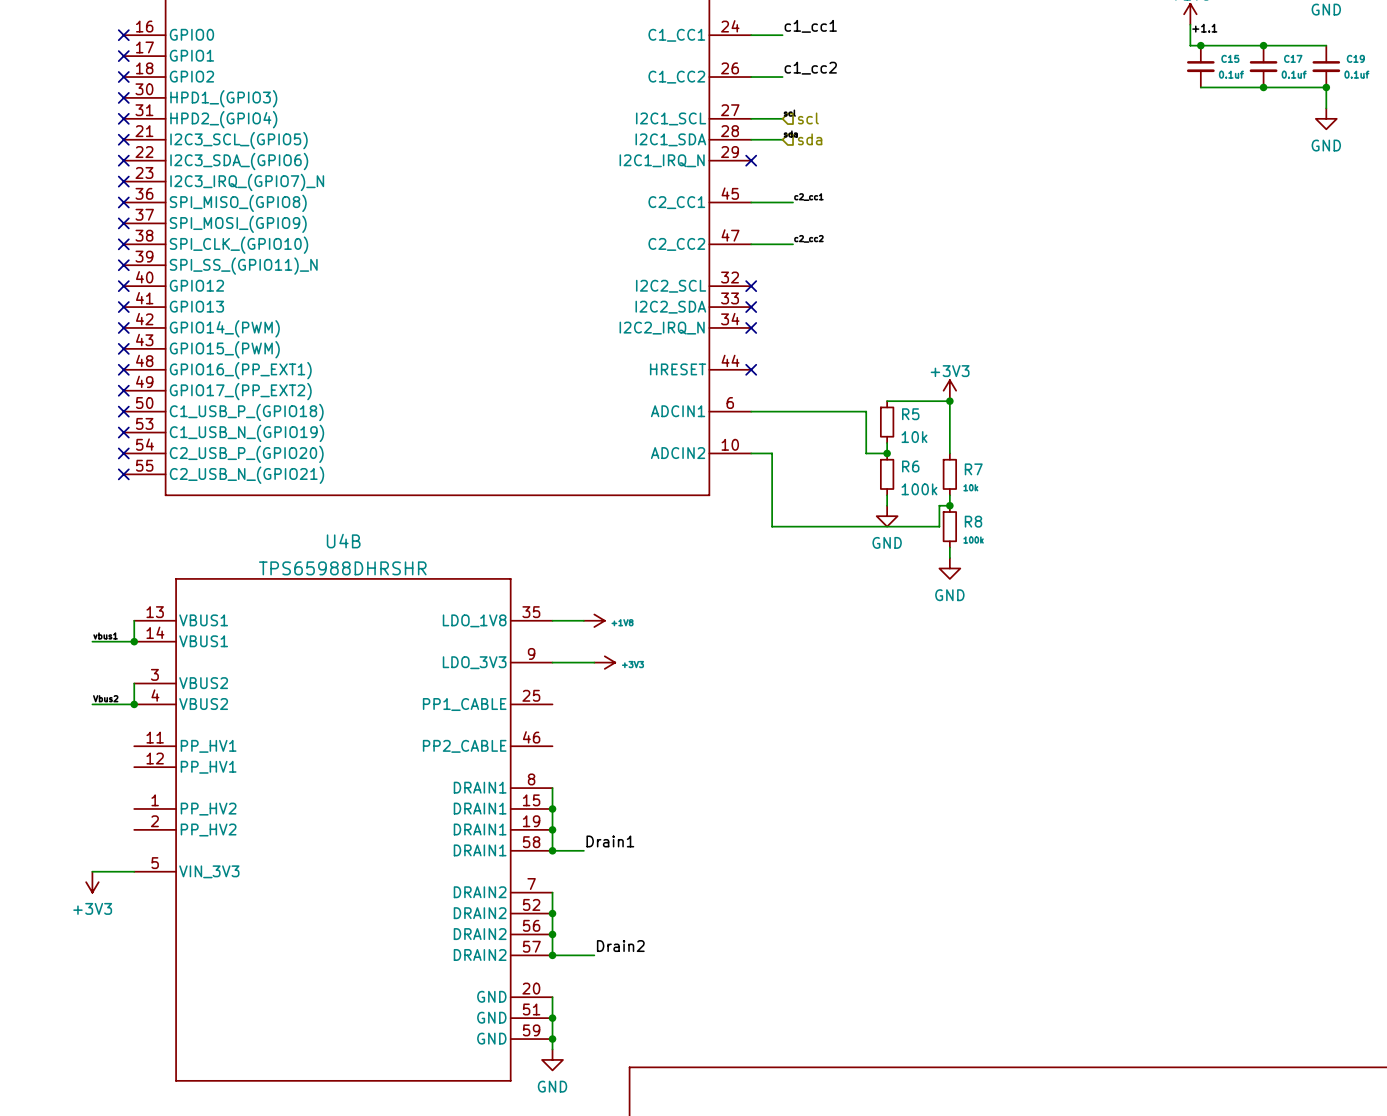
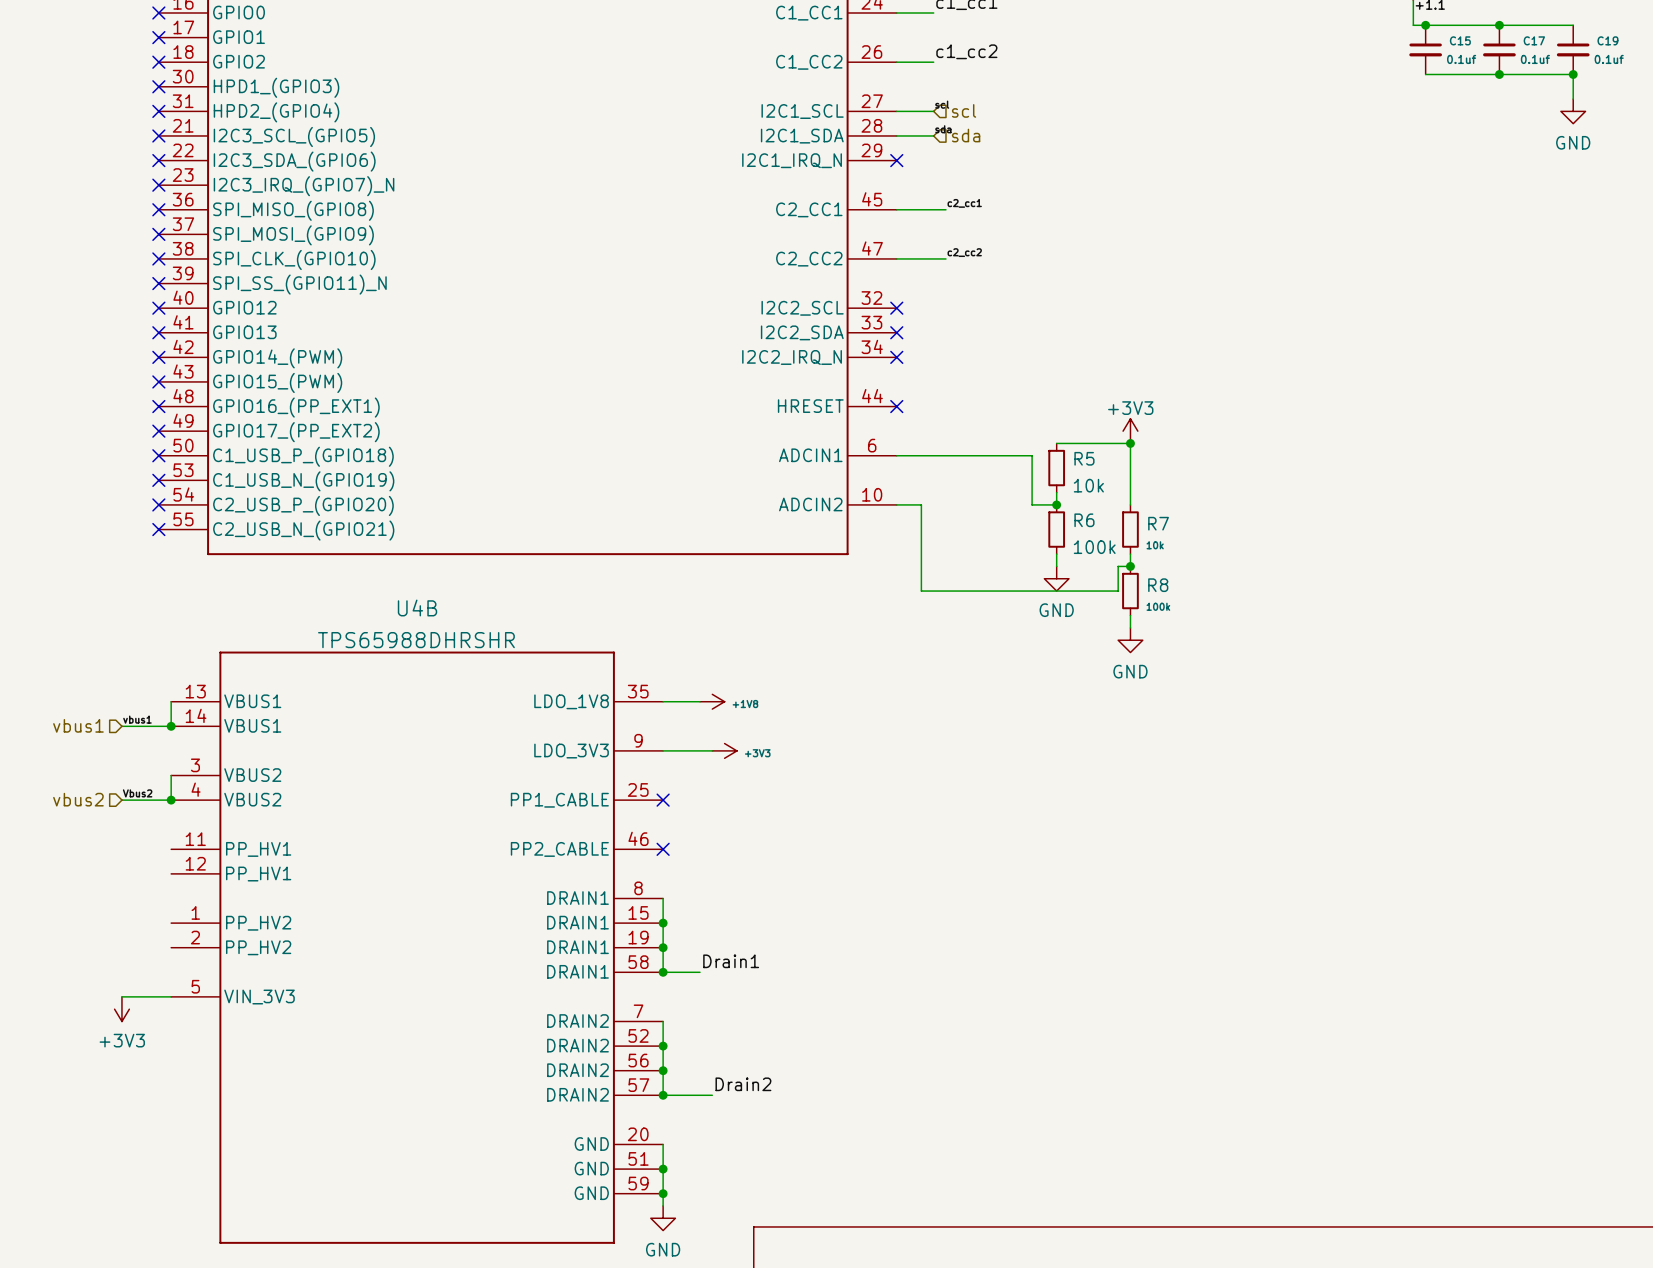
hierarchical label: none -> vbus1 (78, 725)
hierarchical label: none -> vbus2 (78, 799)
no-connect mark: none -> (663, 800)
no-connect mark: none -> (663, 849)

